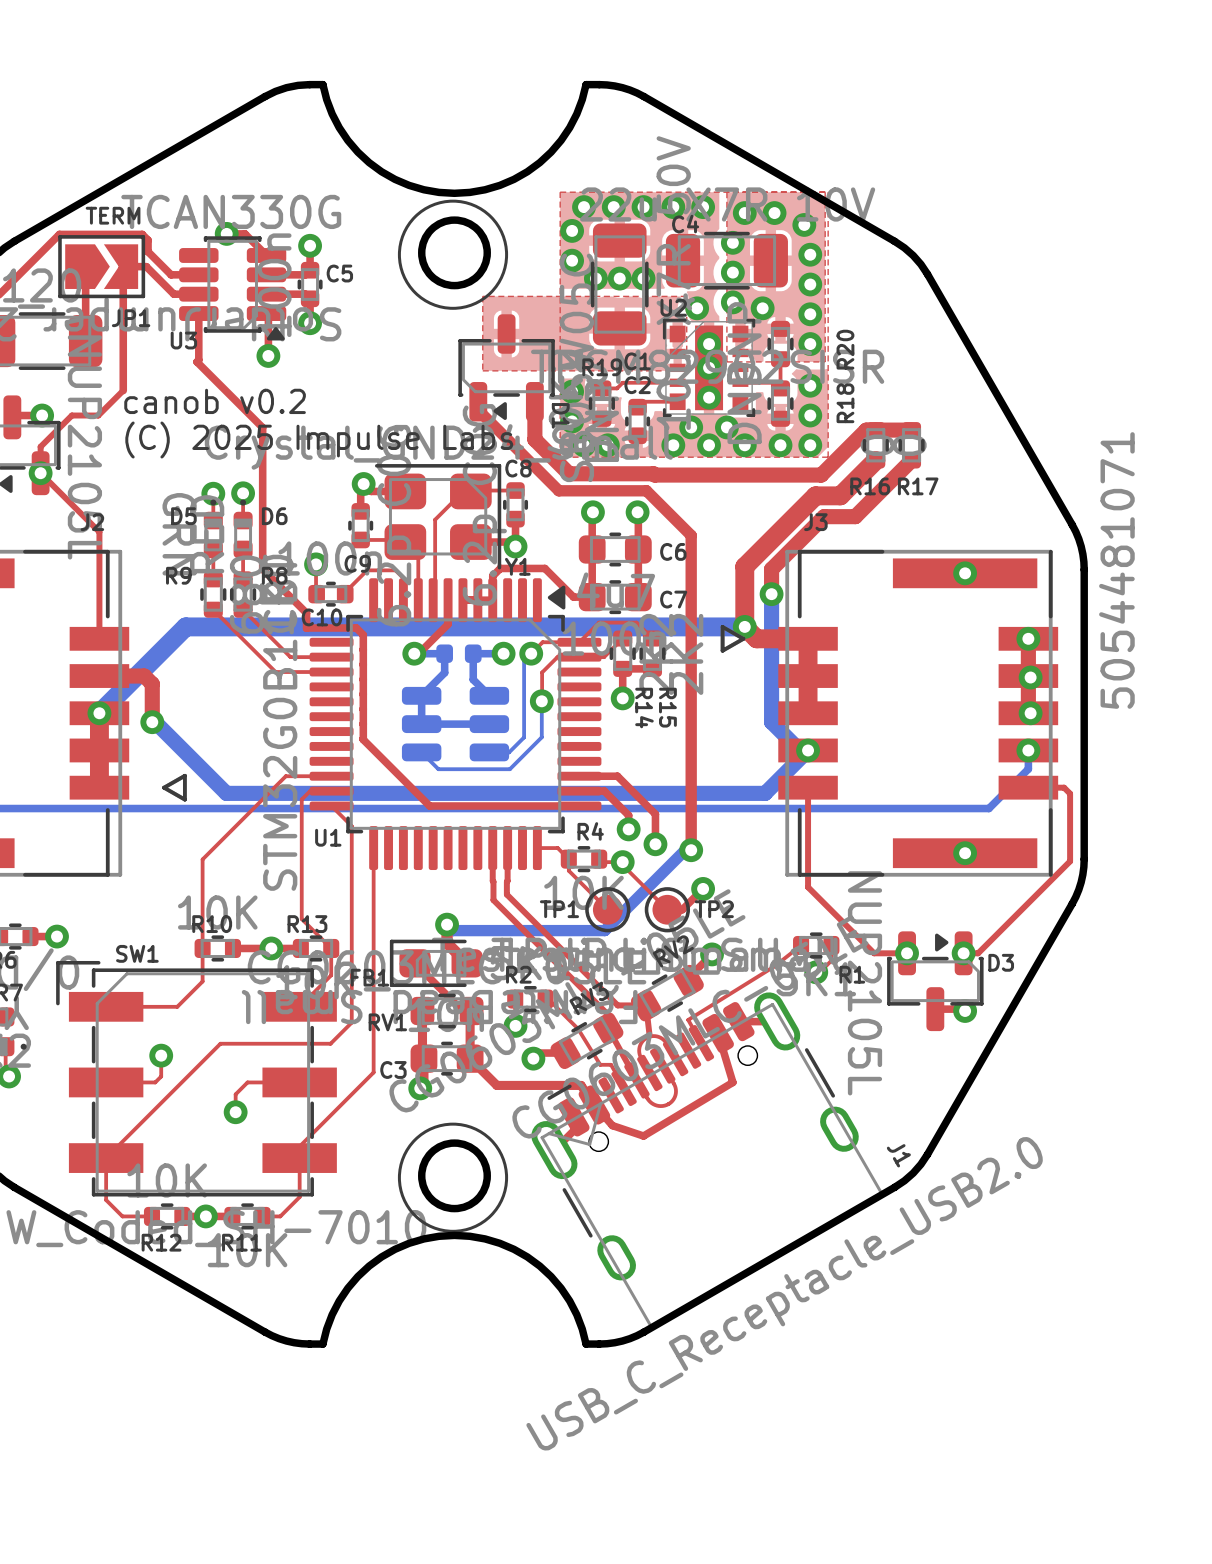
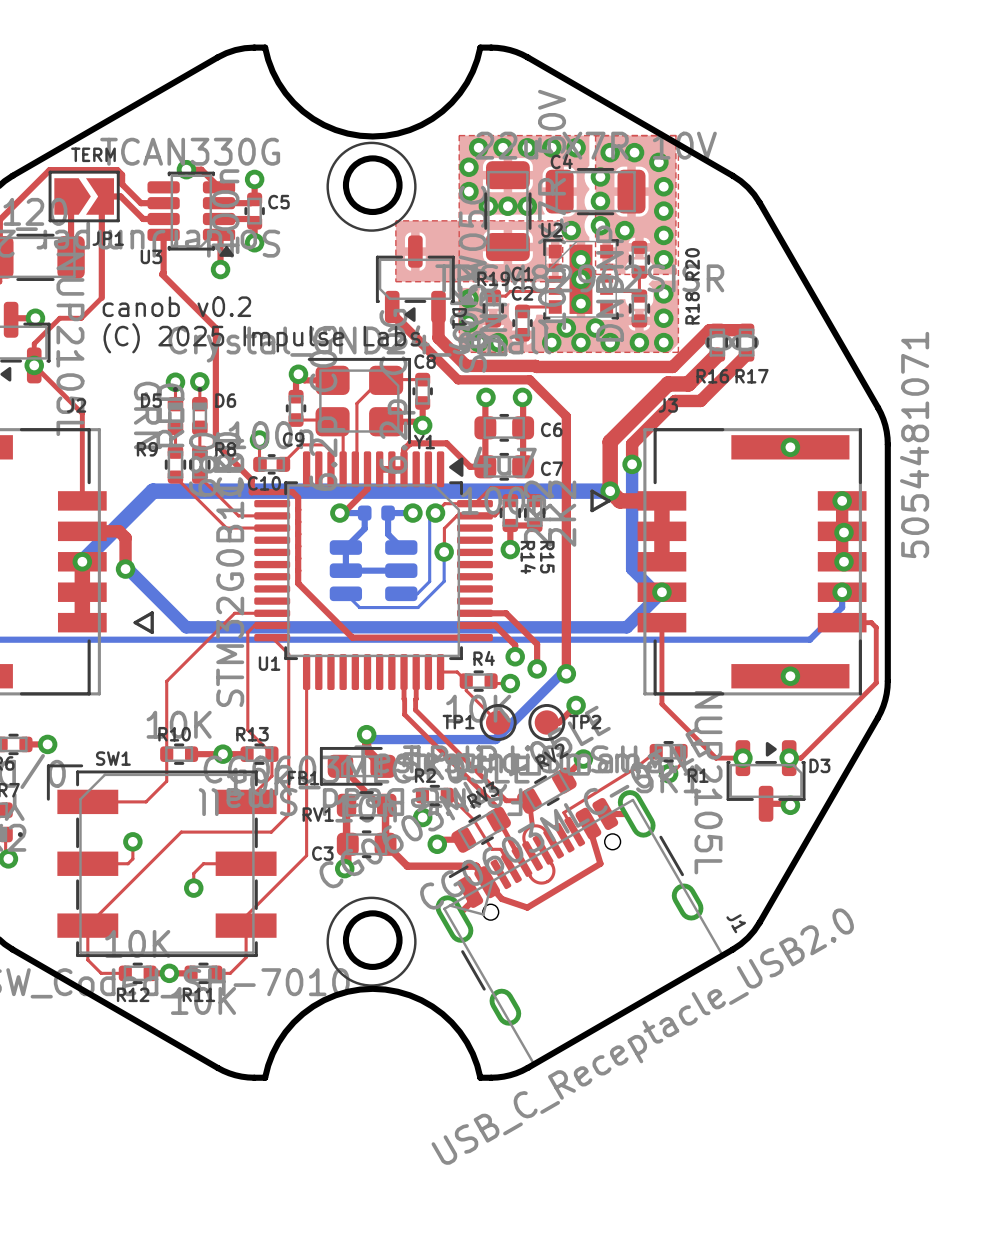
top track: (622, 865) (667, 909) -> none

